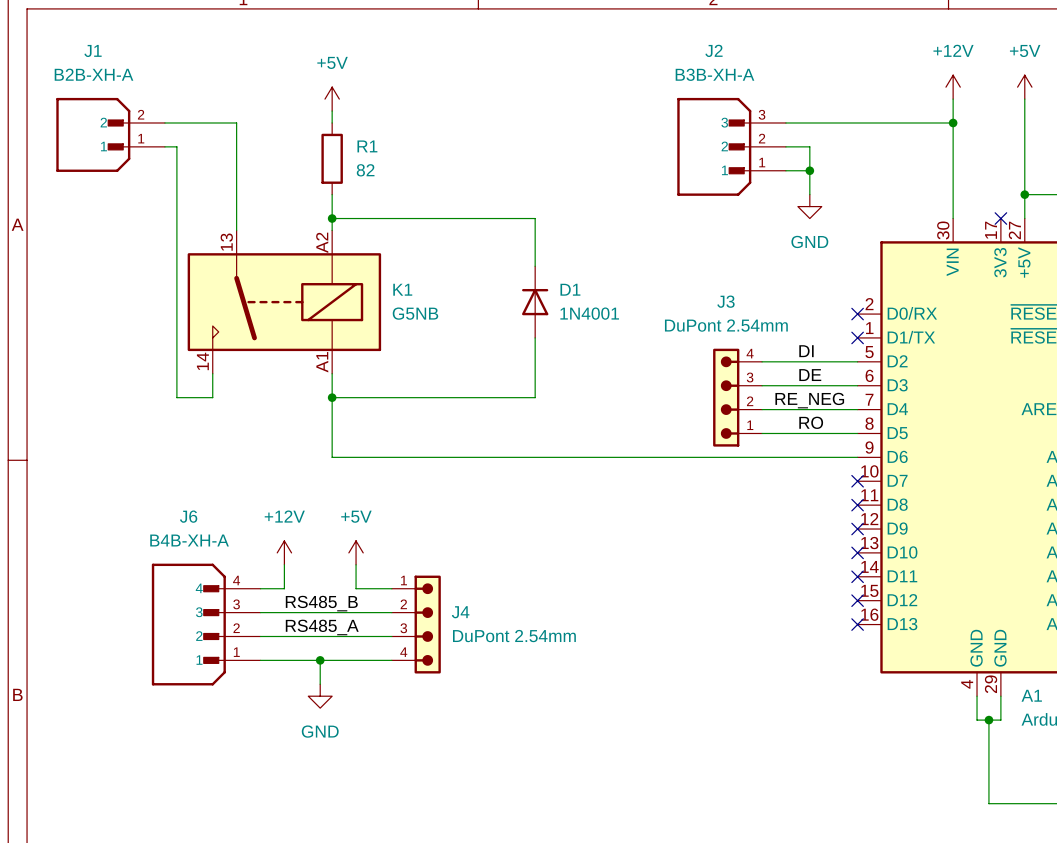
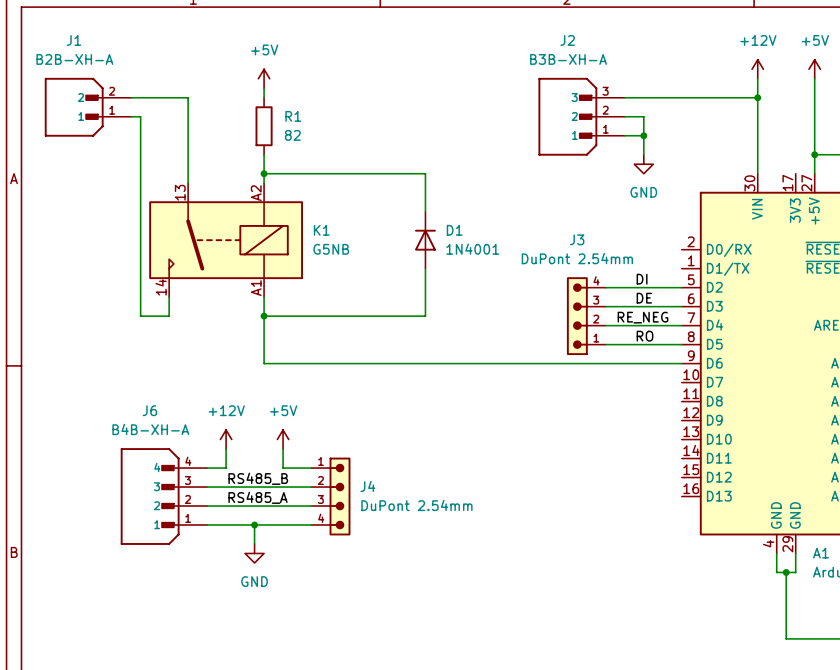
no-connect mark: (1000, 218) -> none
no-connect mark: (857, 314) -> none
no-connect mark: (857, 337) -> none
no-connect mark: (857, 481) -> none
no-connect mark: (857, 505) -> none
no-connect mark: (857, 529) -> none
no-connect mark: (857, 552) -> none
no-connect mark: (857, 576) -> none
no-connect mark: (857, 600) -> none
no-connect mark: (857, 624) -> none

